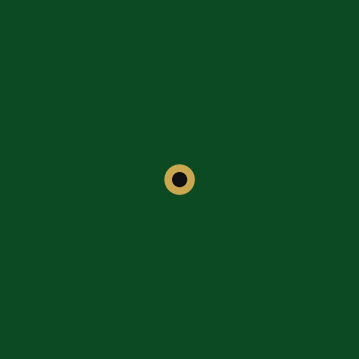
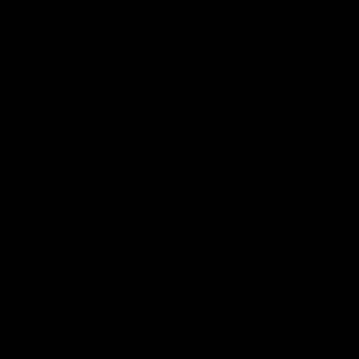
via: (179, 179) -> none

